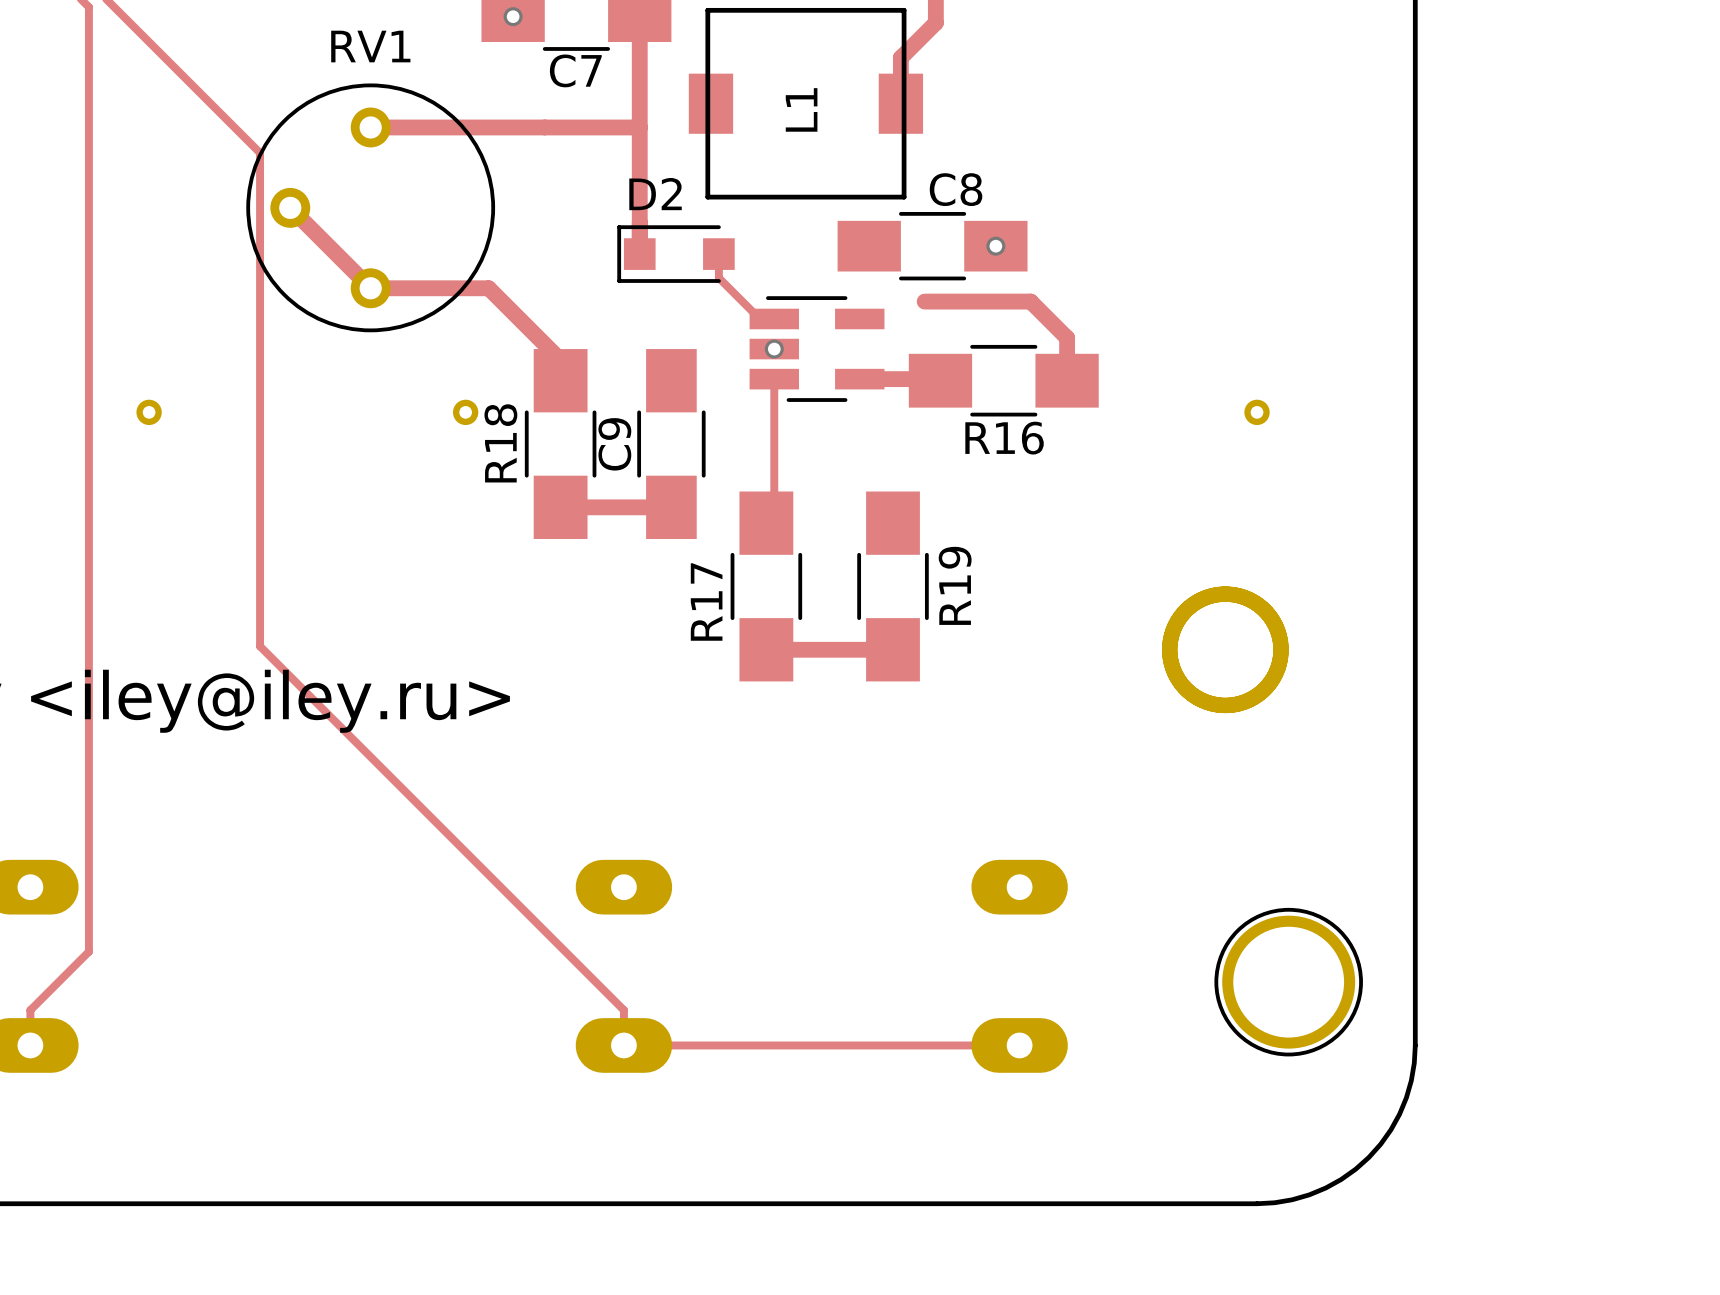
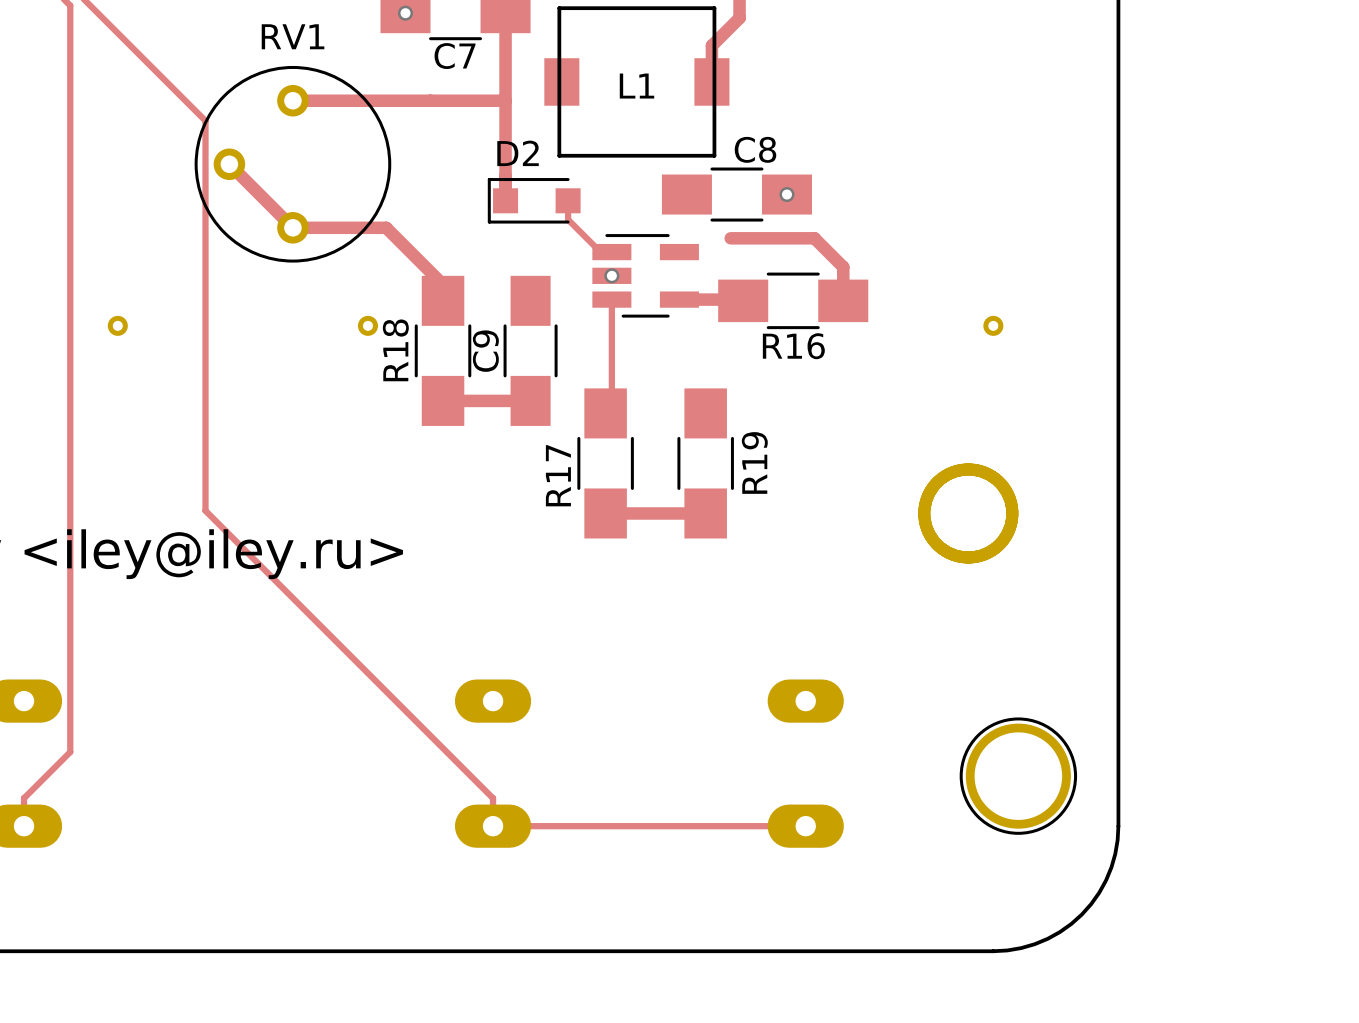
L1 name rotation: 0° (801, 109) -> 90° clockwise (636, 86)

